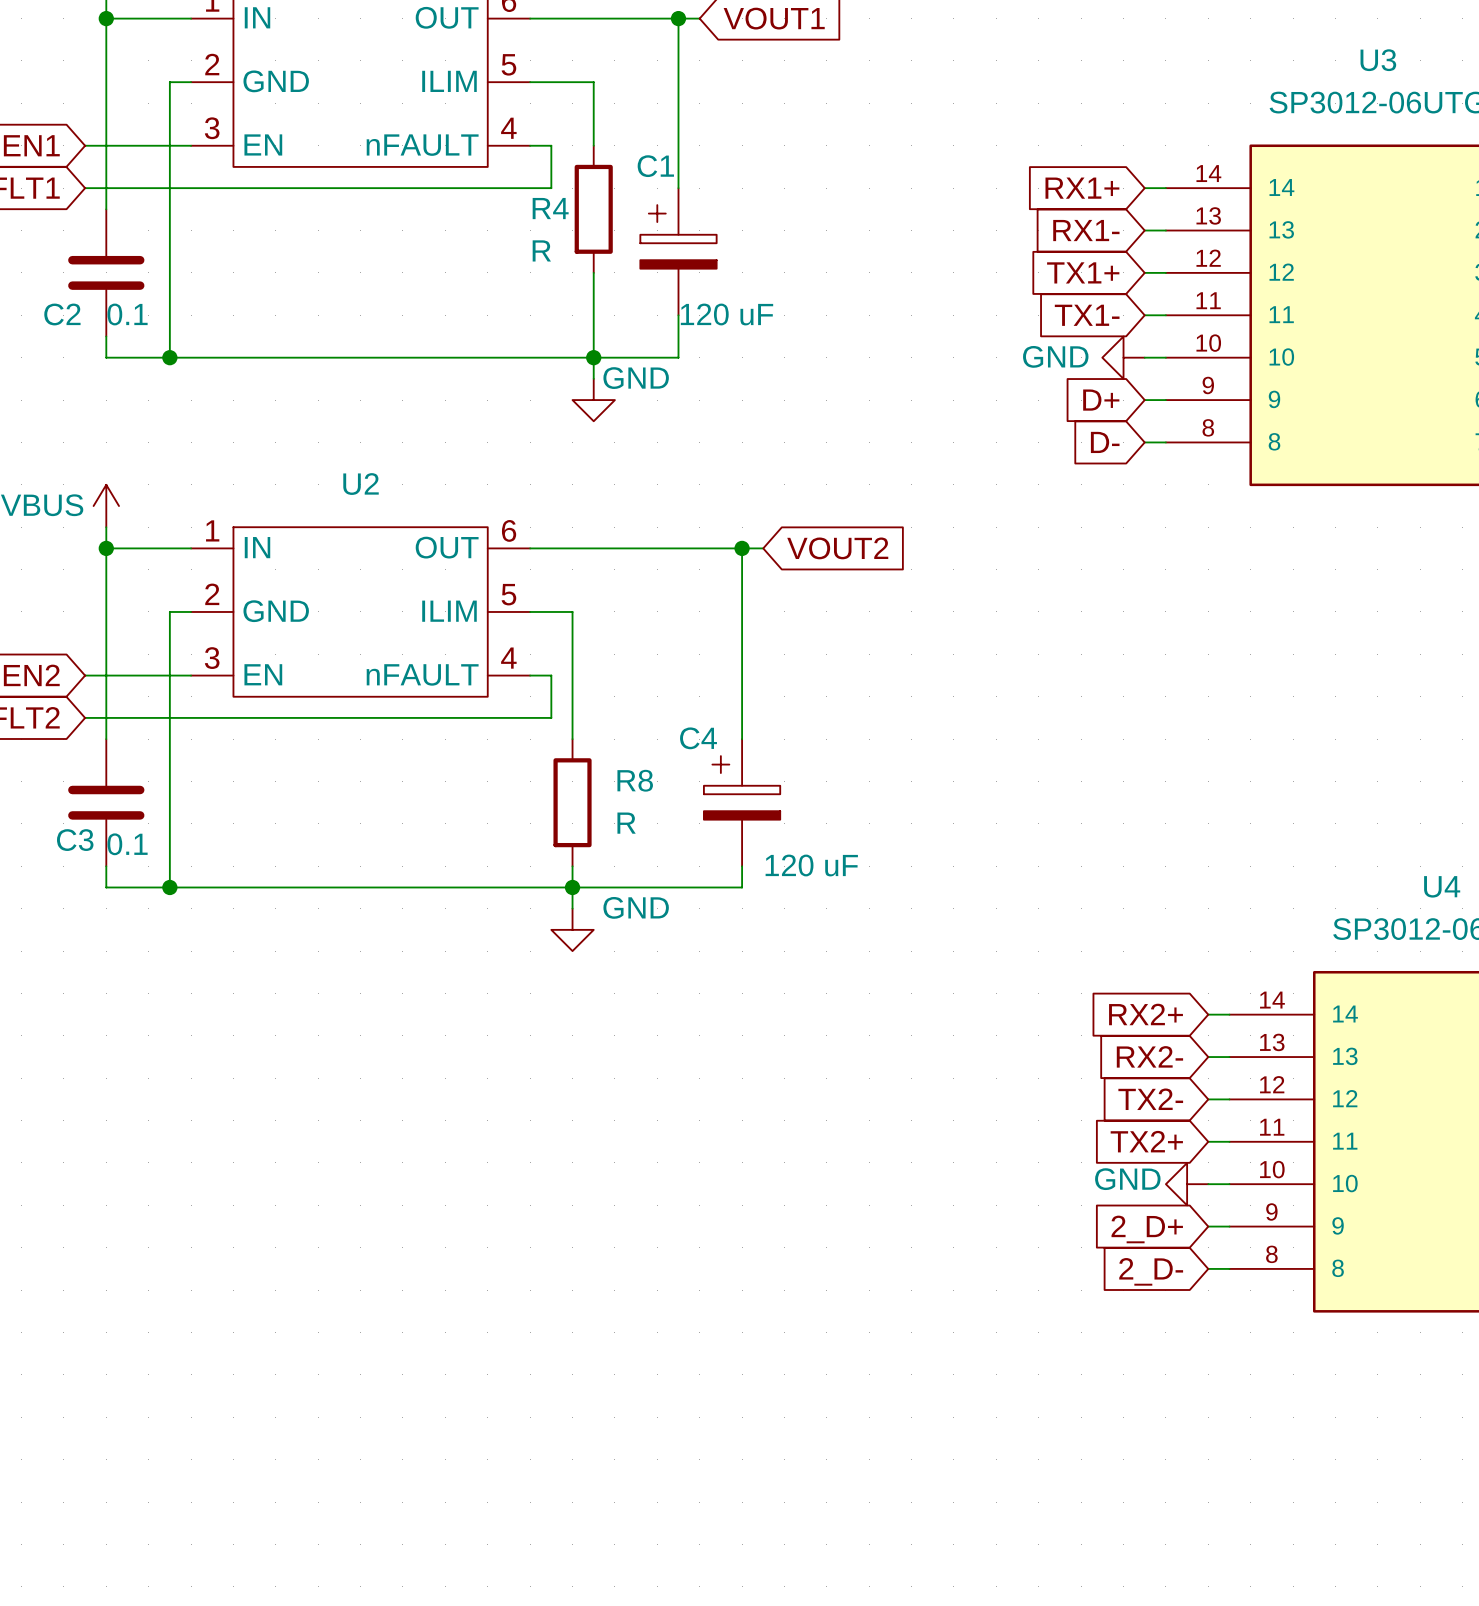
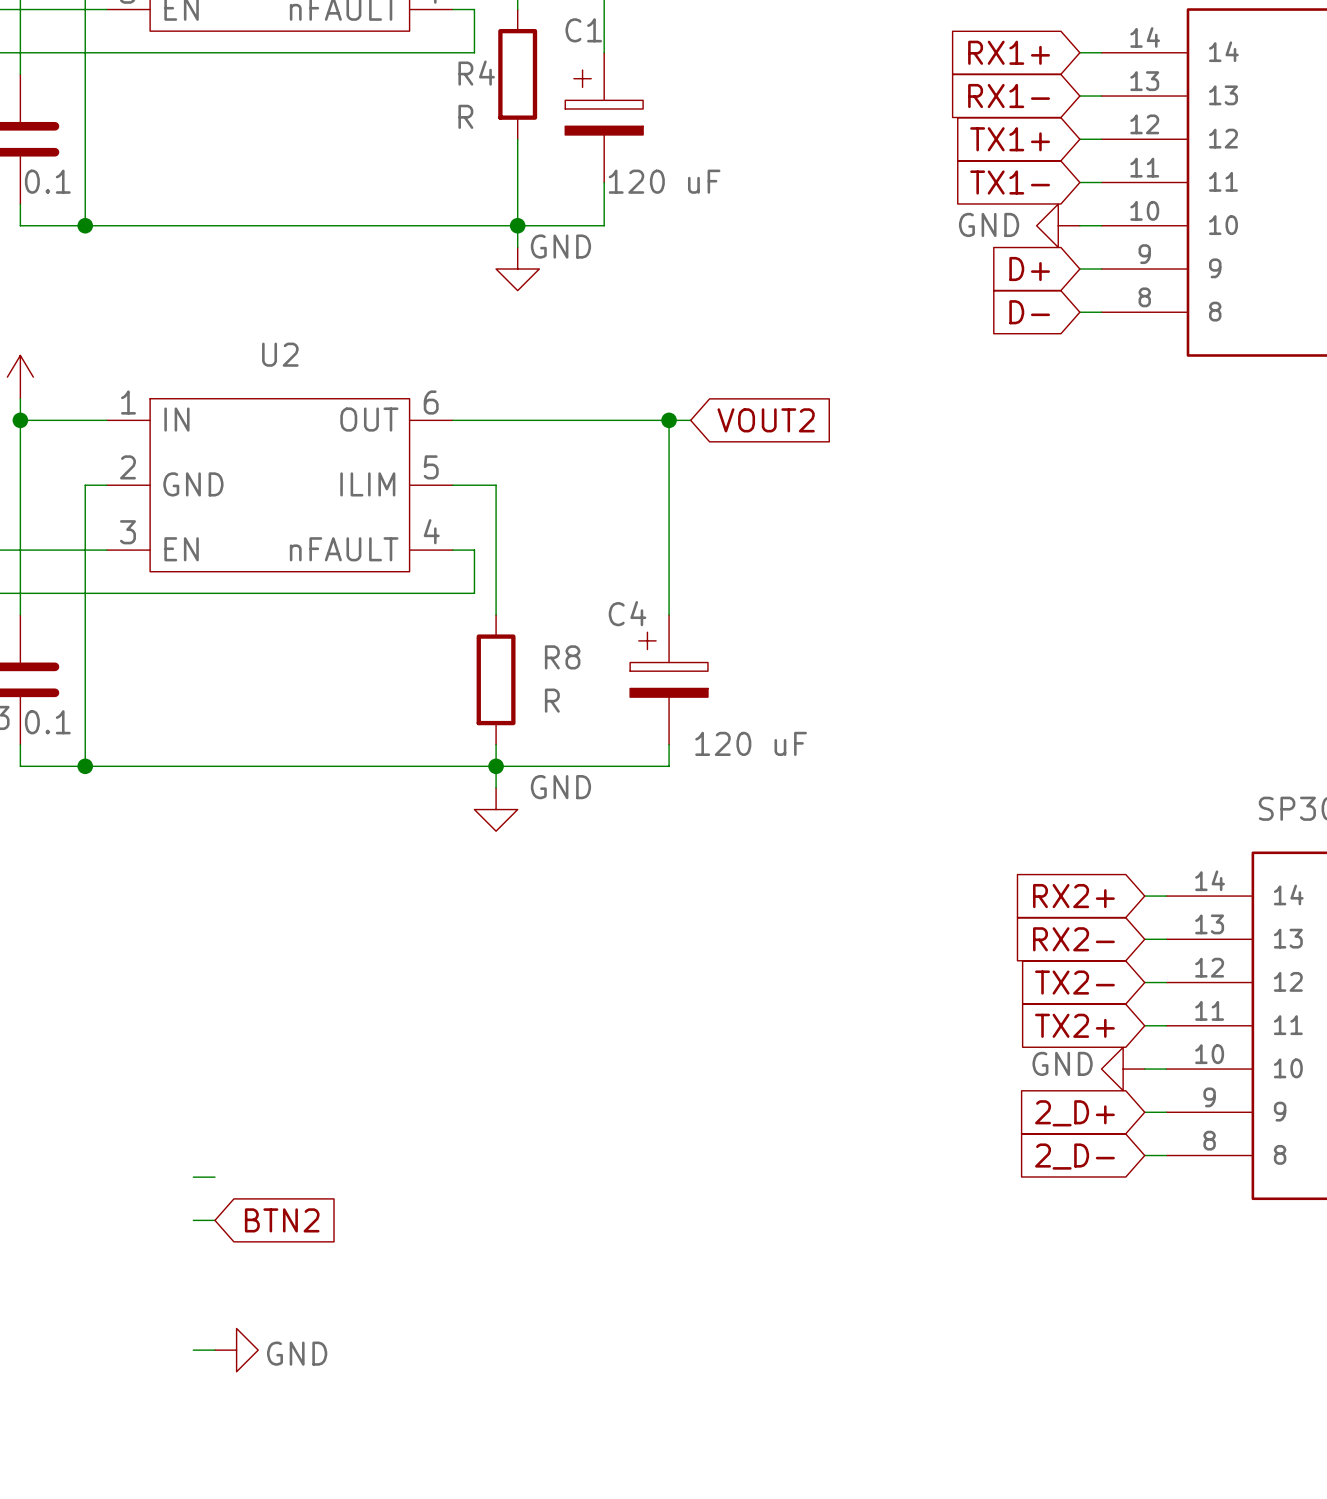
wire: none -> (193, 1177) (214, 1177)
wire: none -> (193, 1220) (214, 1220)
global label: none -> BTN2 (282, 1220)
wire: none -> (193, 1350) (214, 1350)
power symbol: none -> GND (236, 1350)

